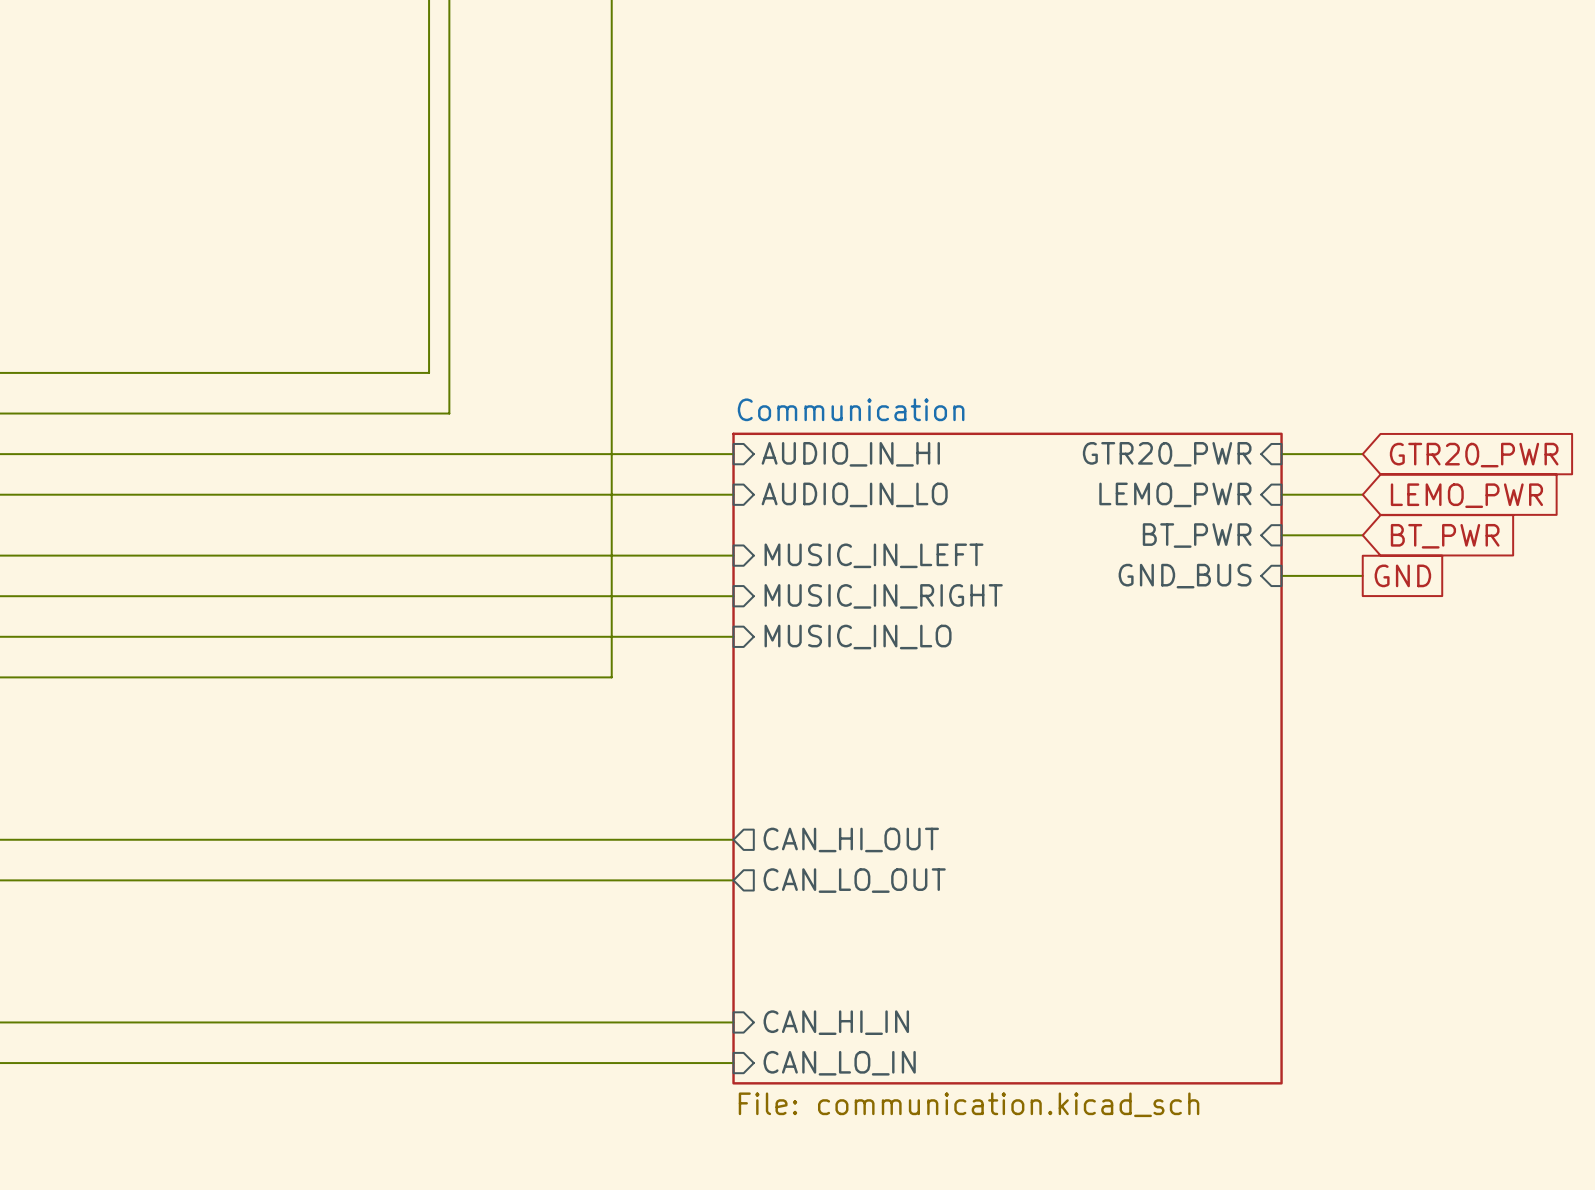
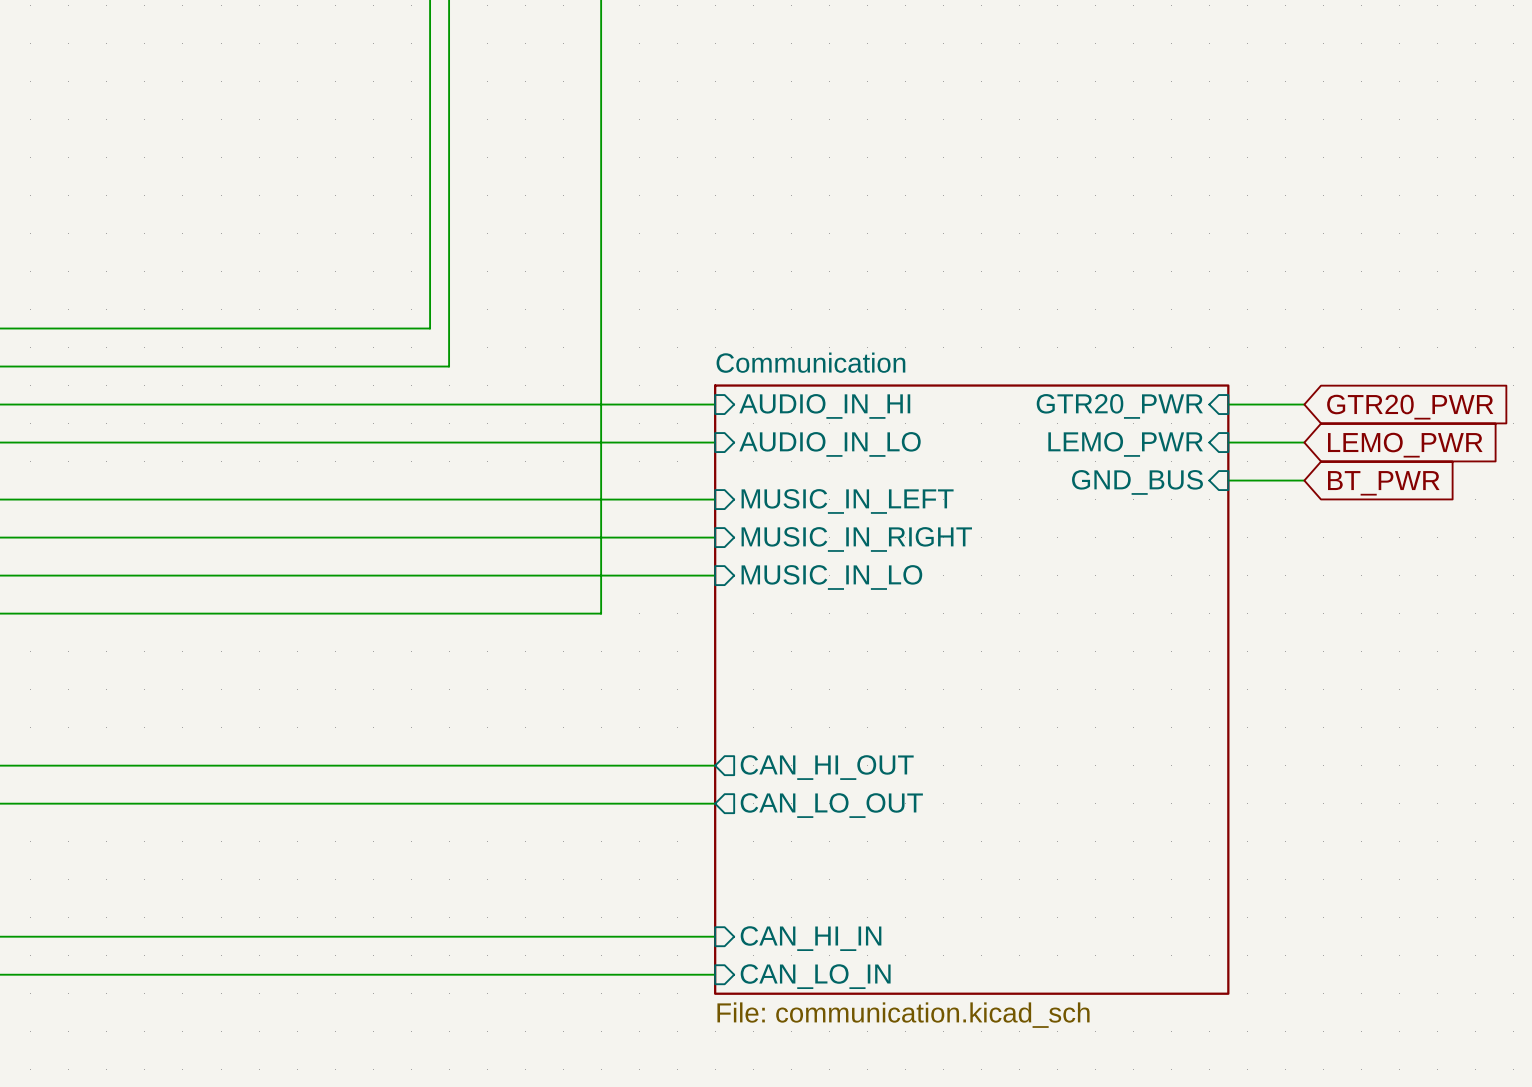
sheet pin: BT_PWR (1197, 535) -> GND_BUS (1137, 482)
wire: (1281, 575) (1362, 575) -> none
global label: GND (1402, 575) -> none
sheet pin: GND_BUS (1185, 576) -> none

